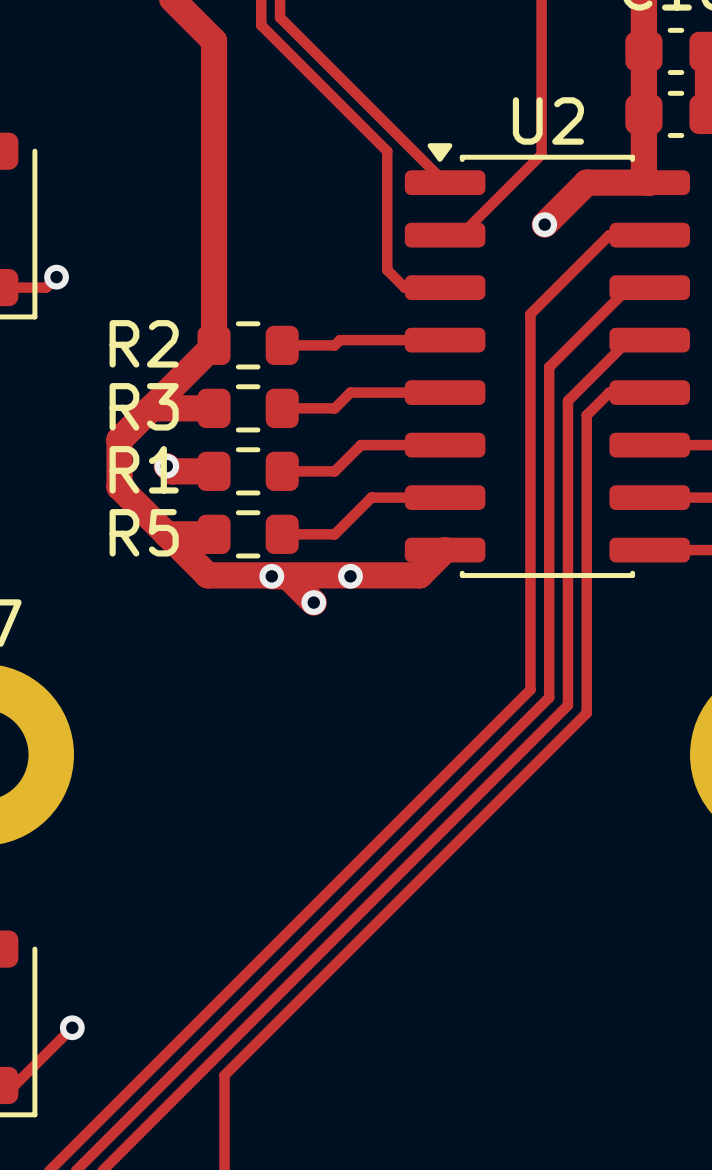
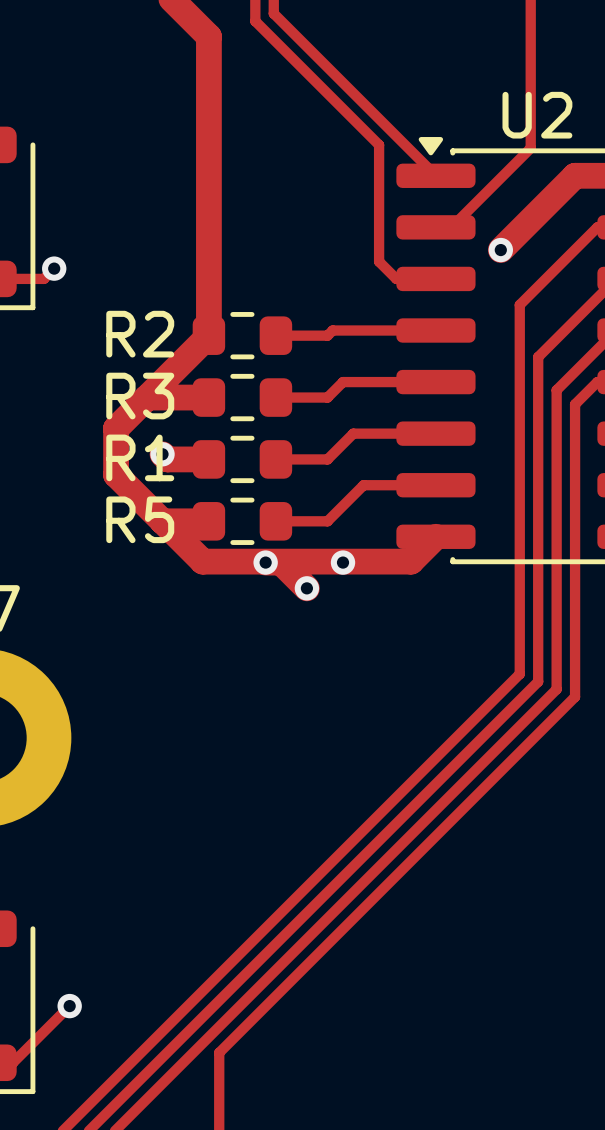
track: none -> (533, 217) (500, 250)
via position: (544, 224) -> (500, 250)

